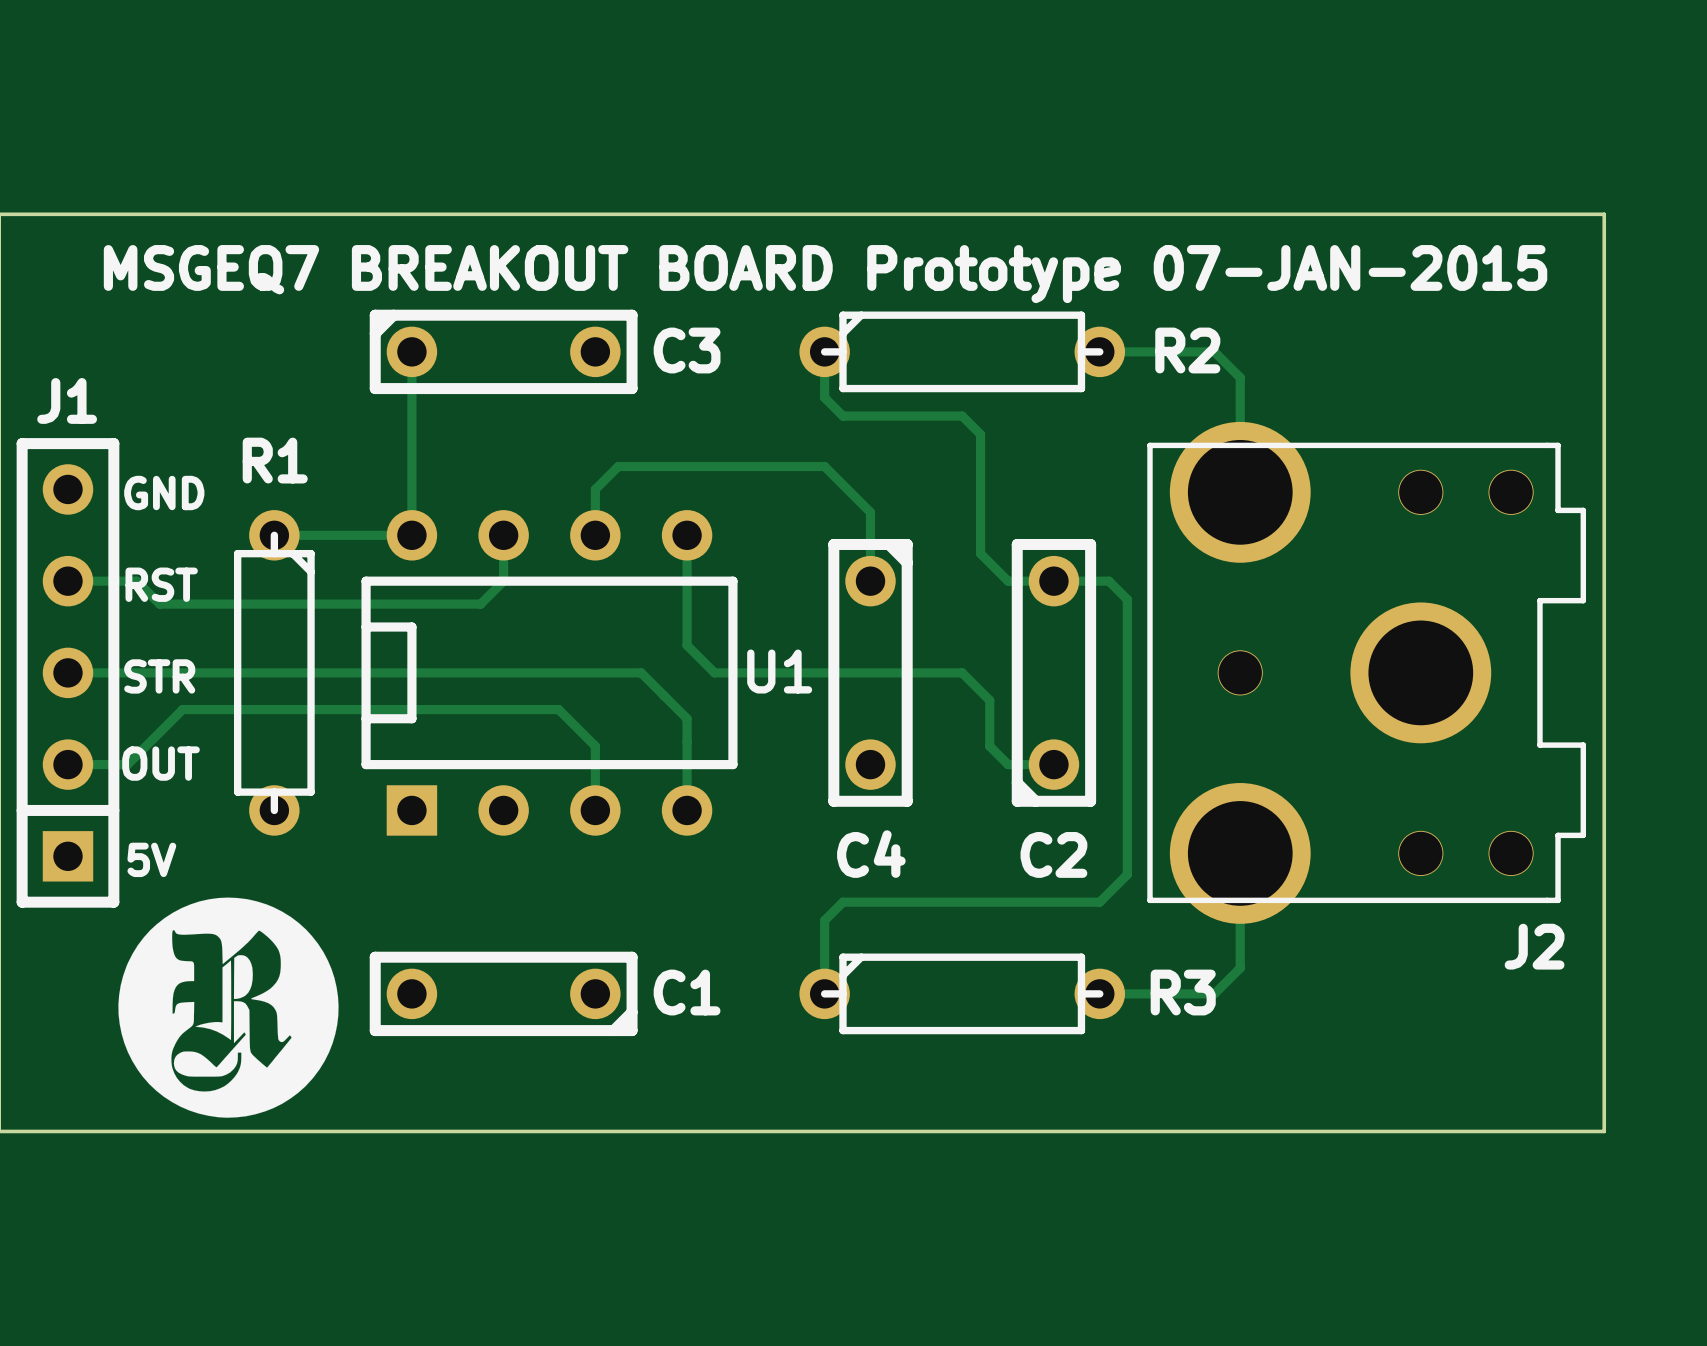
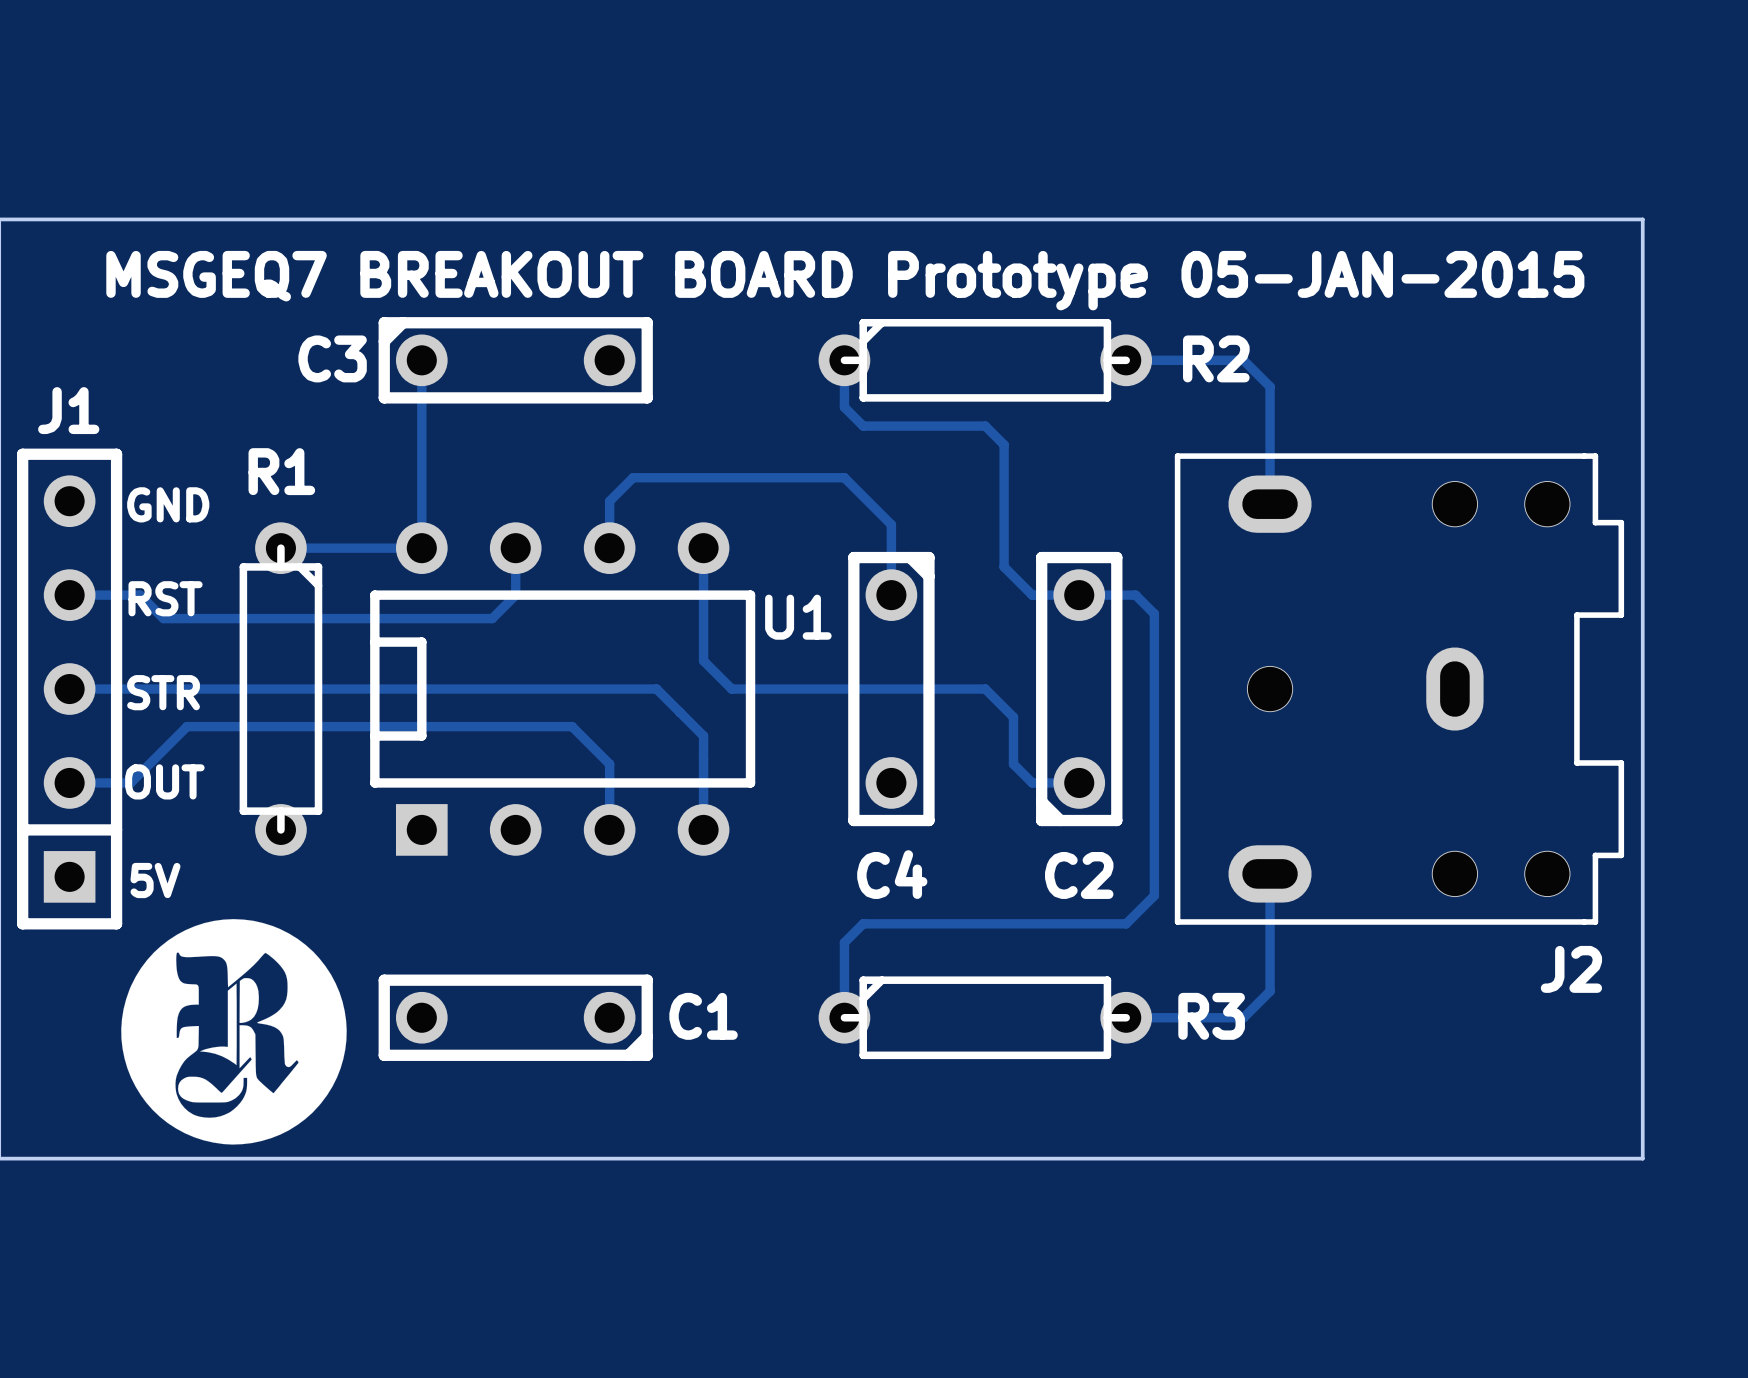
text: MSGEQ7 BREAKOUT BOARD Prototype 07-JAN-2015 (825, 274) -> MSGEQ7 BREAKOUT BOARD Prototype 05-JAN-2015 (845, 280)
C3 name position: C3 (687, 350) -> C3 (332, 358)
J2 footprint: [1147, 421, 1587, 924] -> [1174, 453, 1625, 925]
U1 name position: U1 (779, 671) -> U1 (798, 617)

